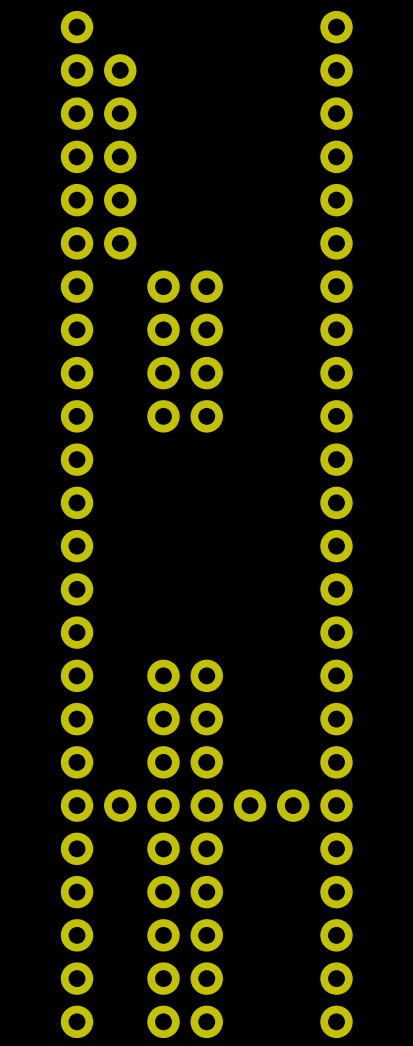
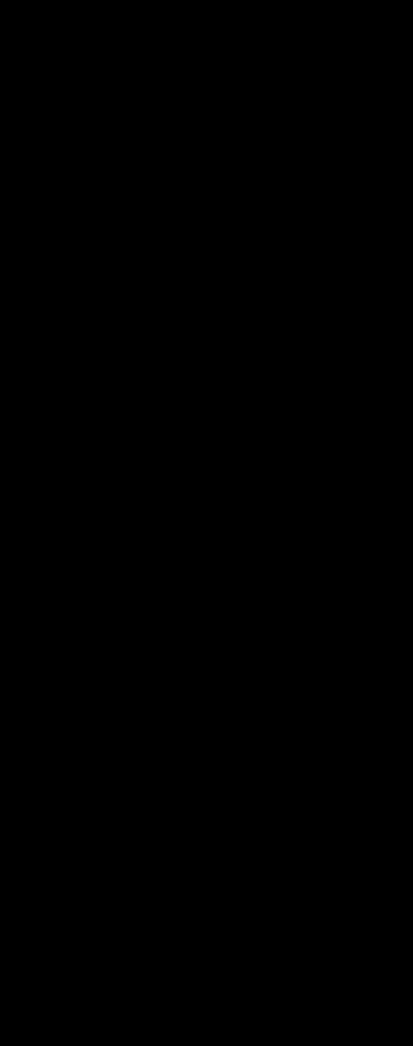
part: (206, 524) -> none

